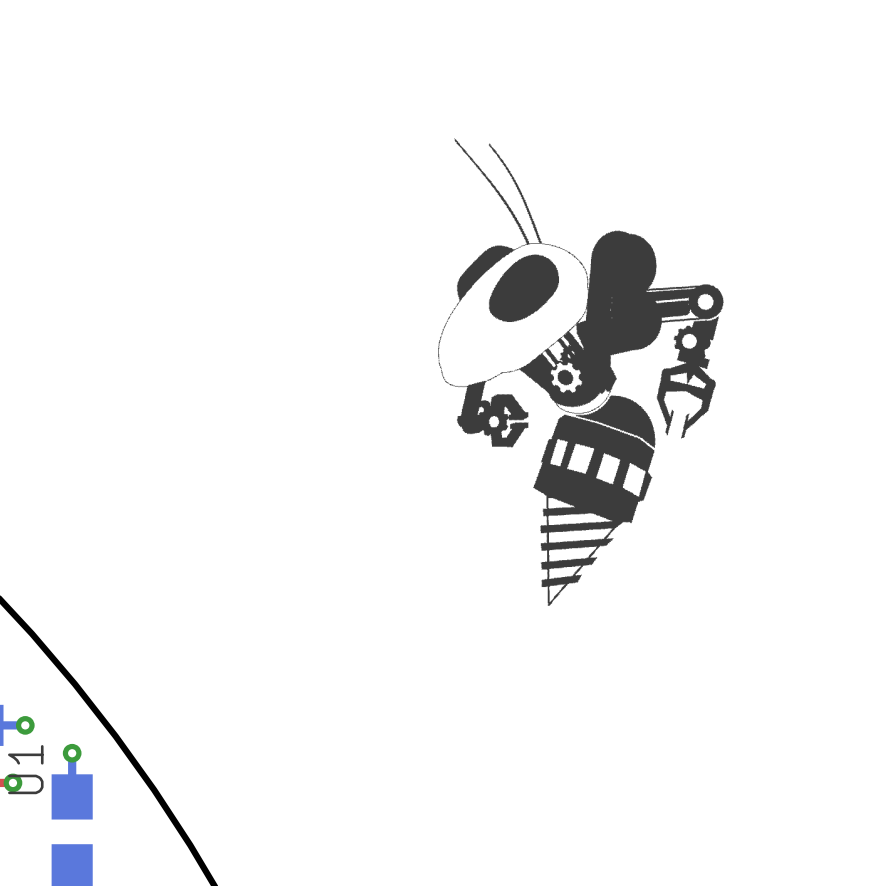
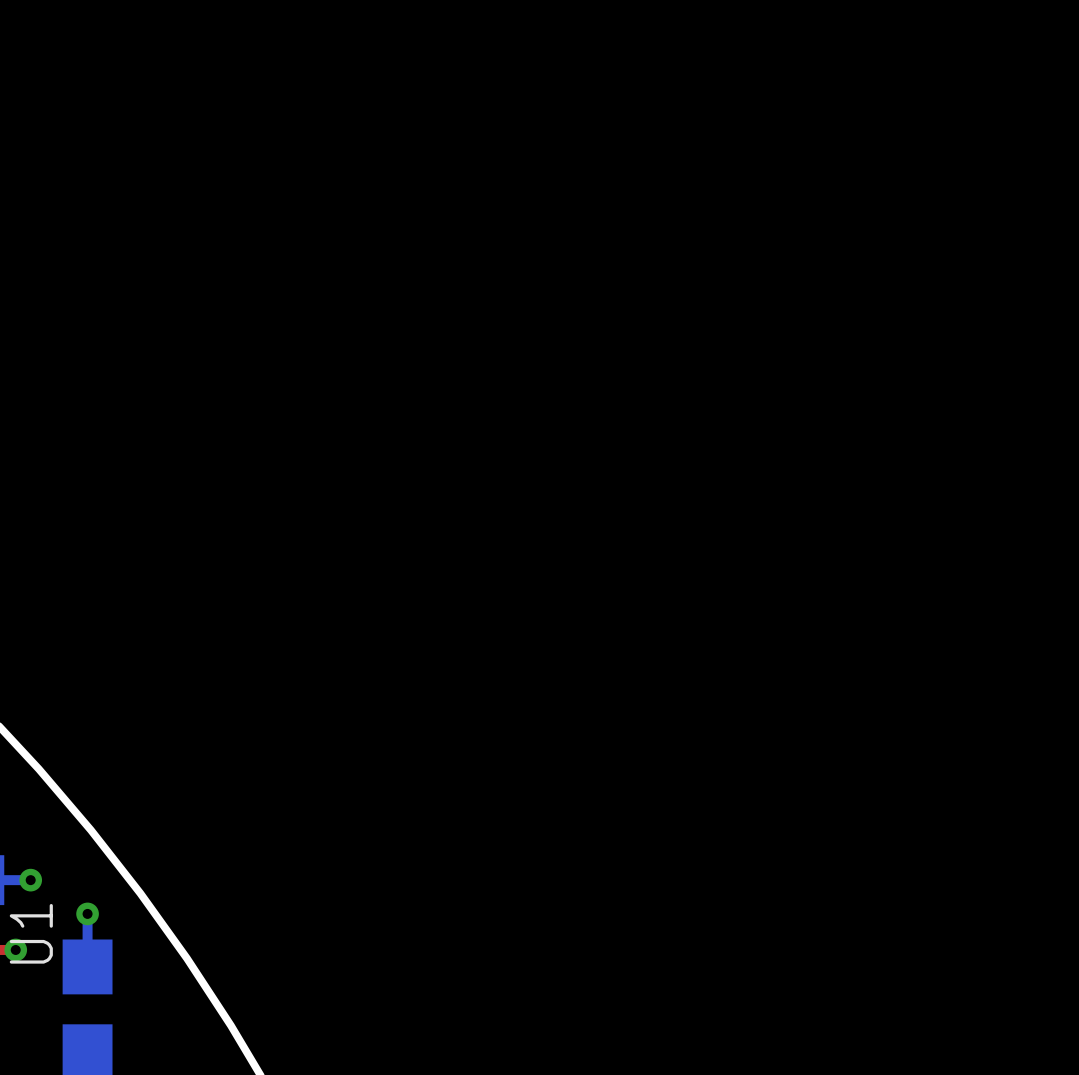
drawing: [438, 138, 724, 606] -> none

